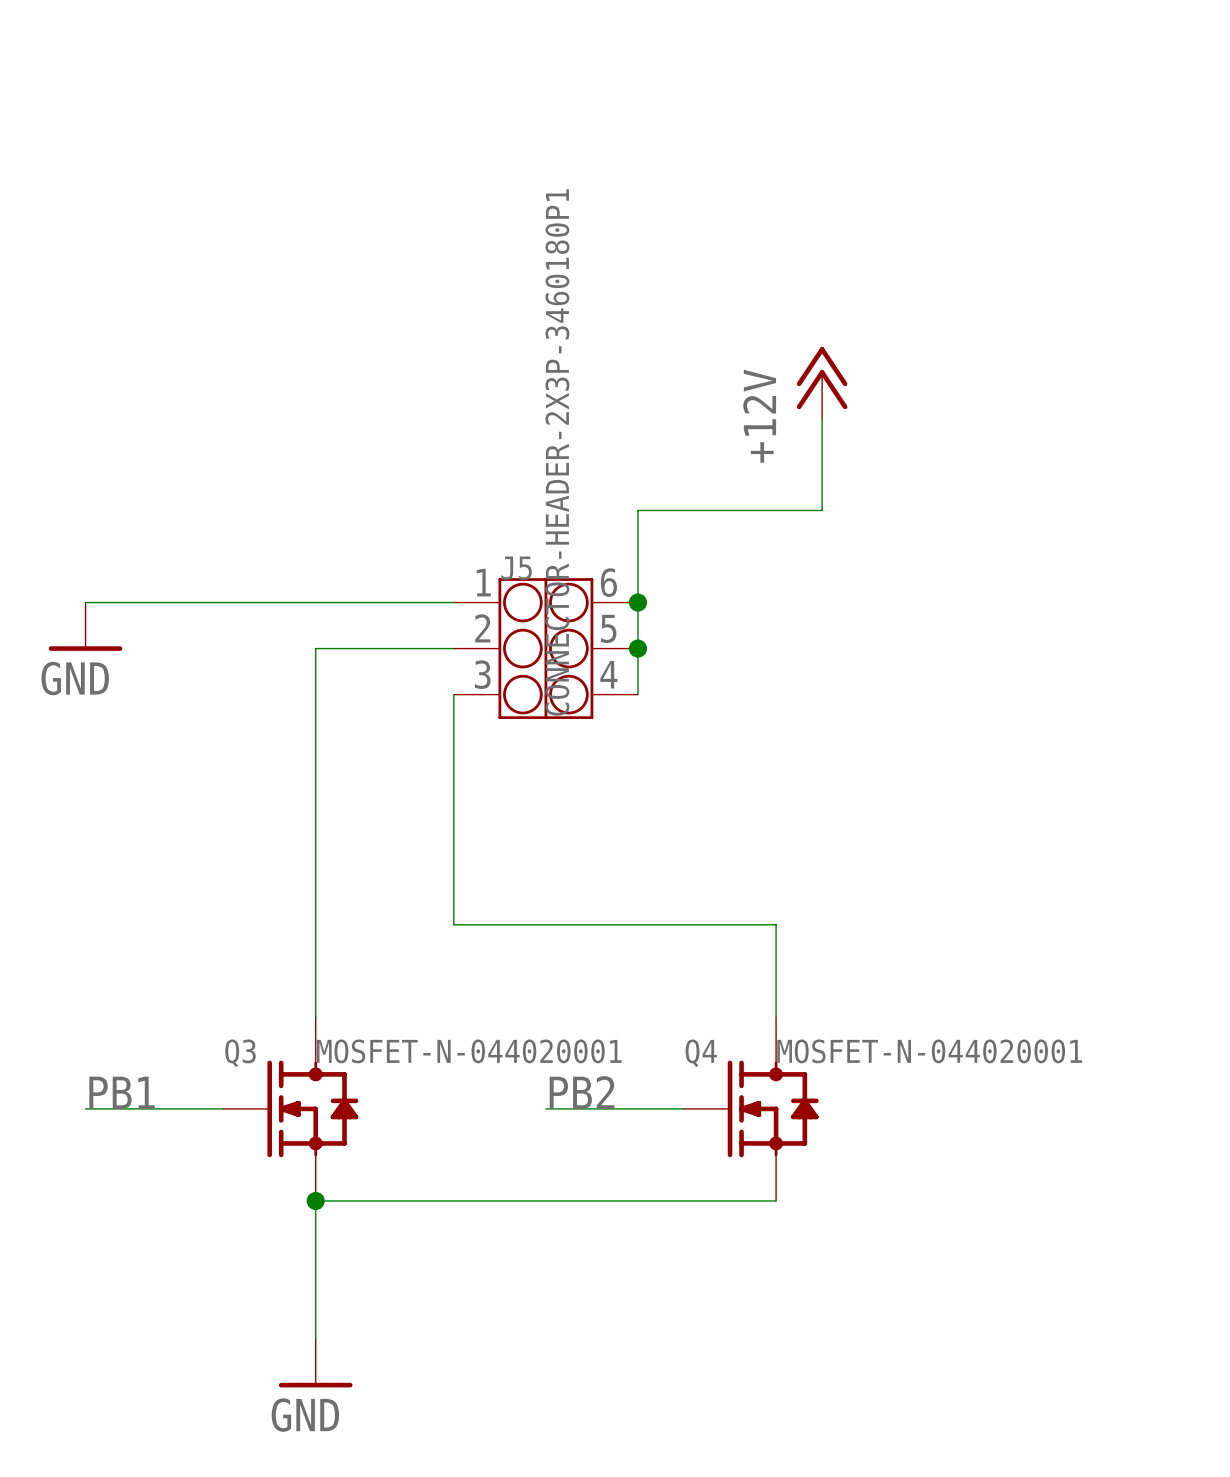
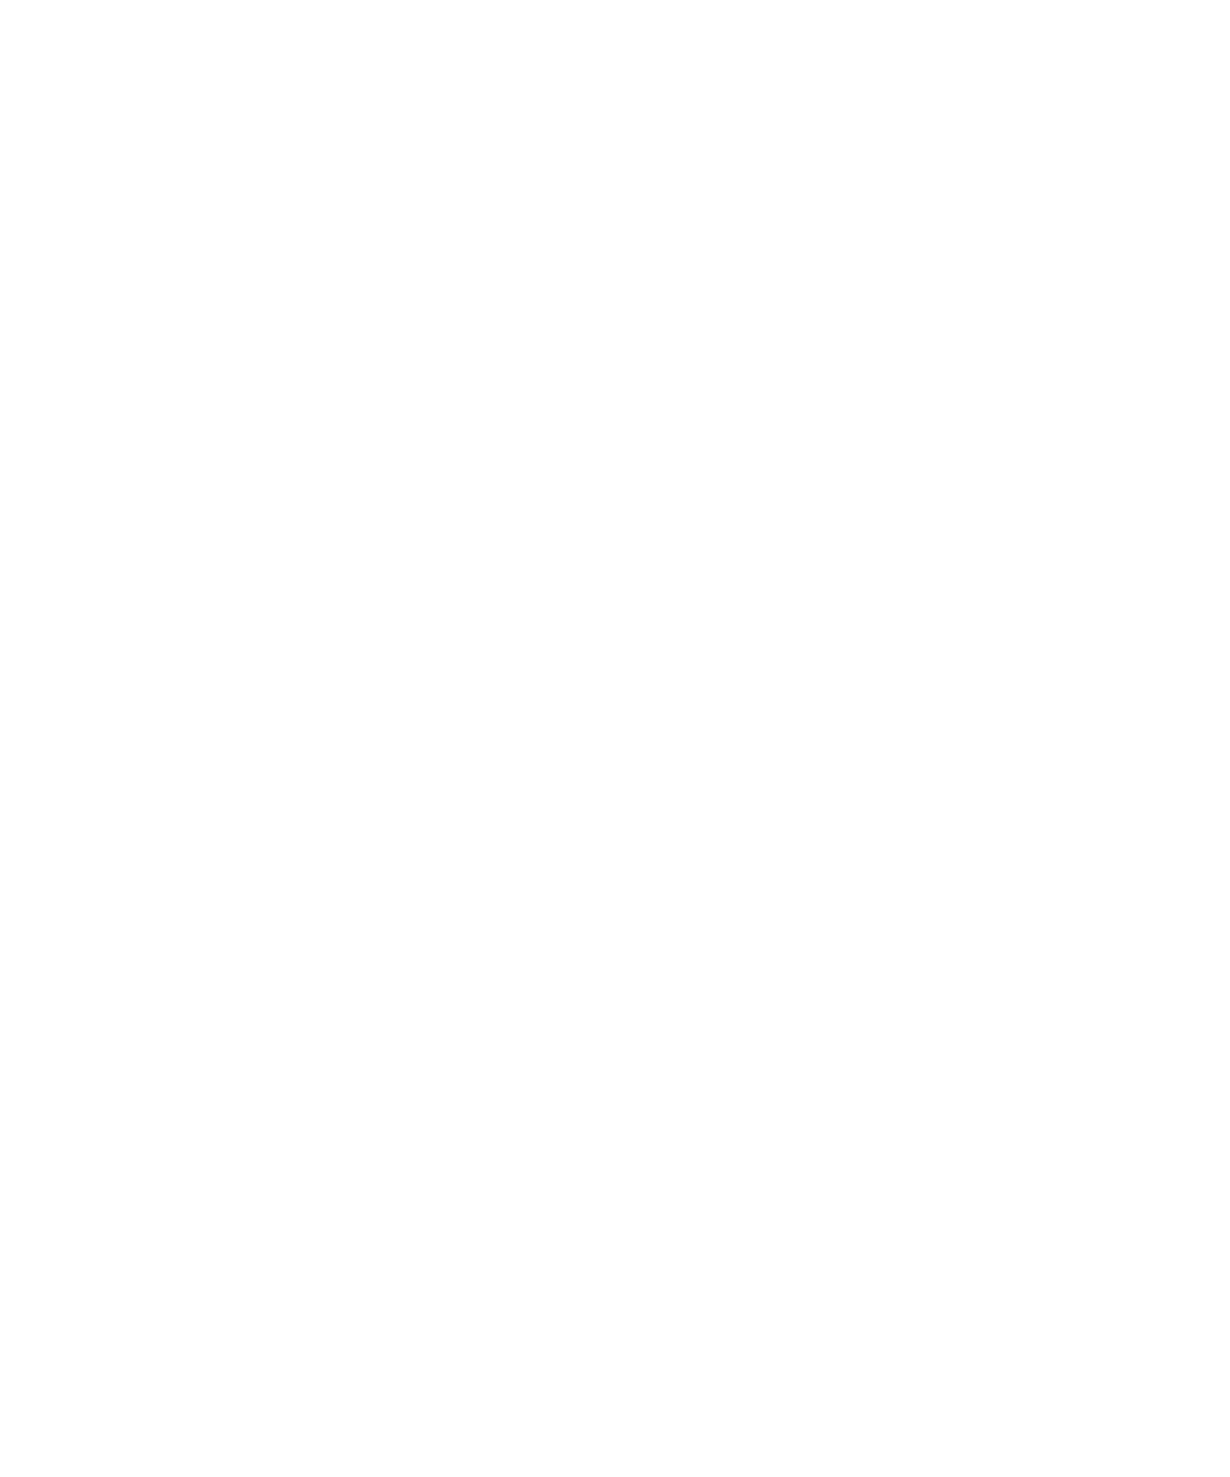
power symbol: +12V (822, 382) -> none
wire: (822, 418) (822, 510) (637, 510) (637, 694) -> none
wire: (85, 602) (453, 602) -> none
junction: (637, 602) -> none
power symbol: GND (85, 626) -> none
wire: (453, 648) (315, 648) (315, 1016) -> none
J5: CONNECTOR-HEADER-2X3P-3460180P1 (545, 648) -> none
junction: (637, 648) -> none
wire: (453, 694) (453, 924) (776, 924) (776, 1016) -> none
label: PB1 (122, 1092) -> none
label: PB2 (582, 1092) -> none
wire: (85, 1108) (223, 1108) -> none
Q3: MOSFET-N-044020001 (290, 1108) -> none
wire: (545, 1108) (684, 1108) -> none
Q4: MOSFET-N-044020001 (751, 1108) -> none
junction: (315, 1200) -> none
wire: (776, 1200) (315, 1200) (315, 1339) -> none
power symbol: GND (315, 1363) -> none

